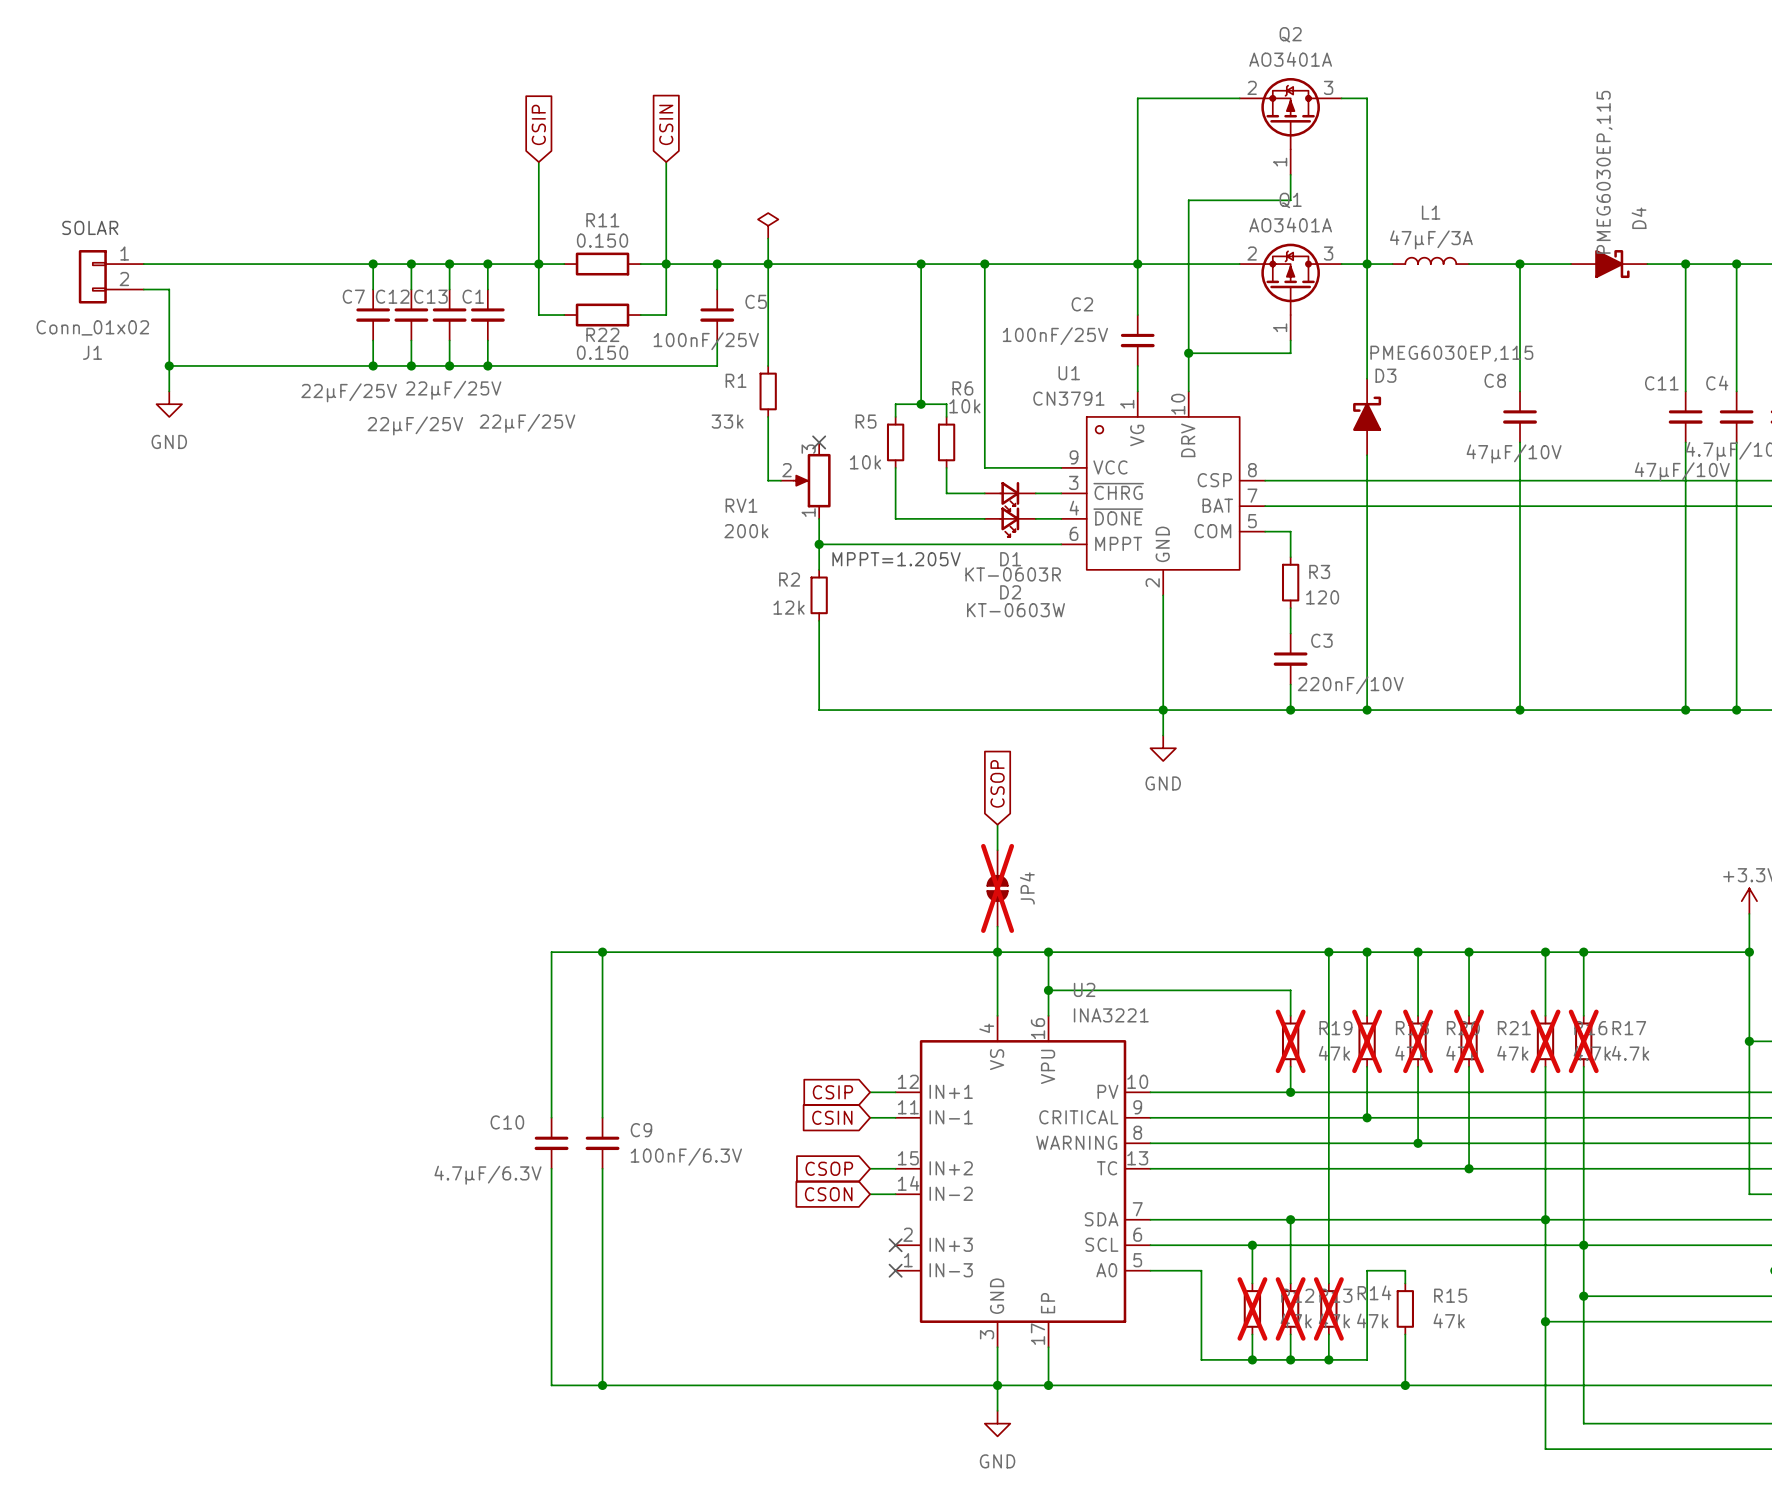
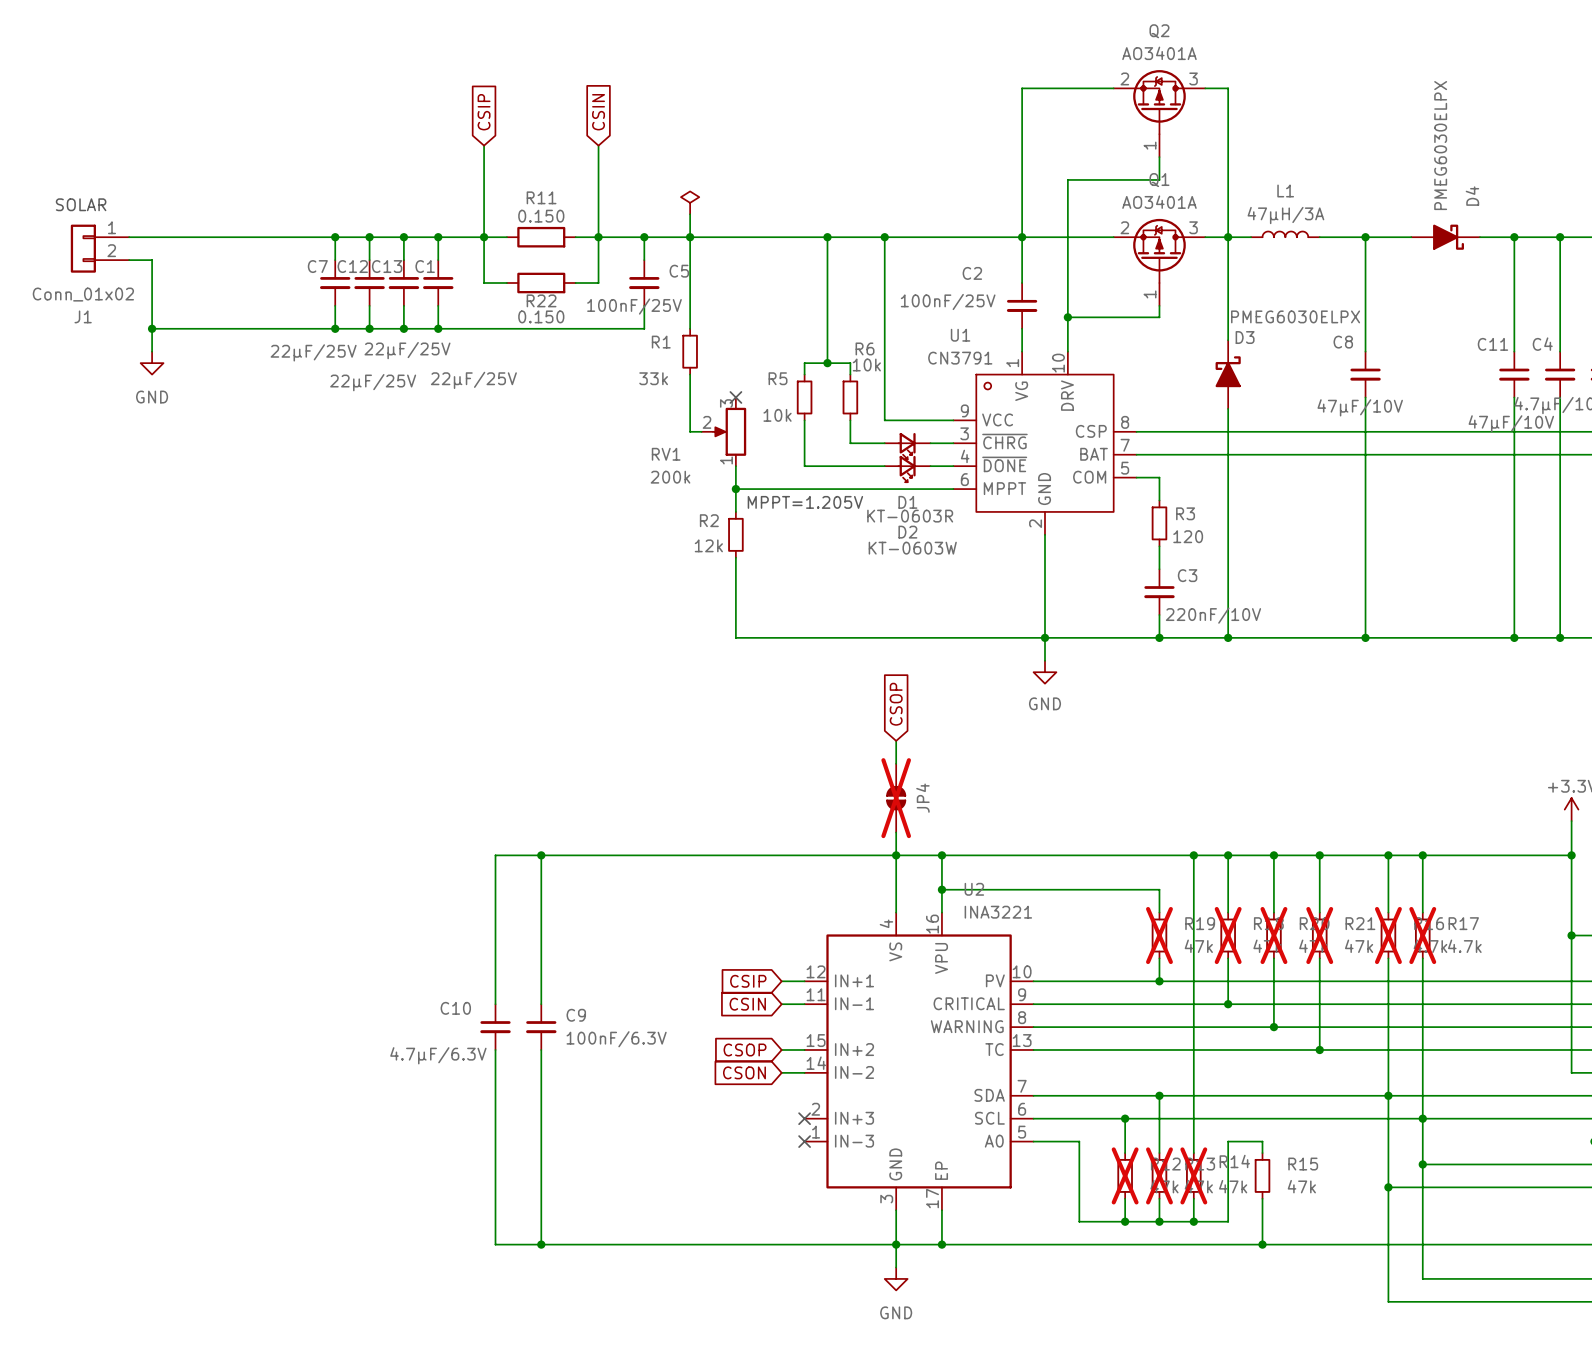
D4 value: PMEG6030EP,115 (1604, 172) -> PMEG6030ELPX (1440, 145)
L1 value: 47µF/3A (1431, 239) -> 47µH/3A (1285, 215)
D3 value: PMEG6030EP,115 (1451, 353) -> PMEG6030ELPX (1295, 316)

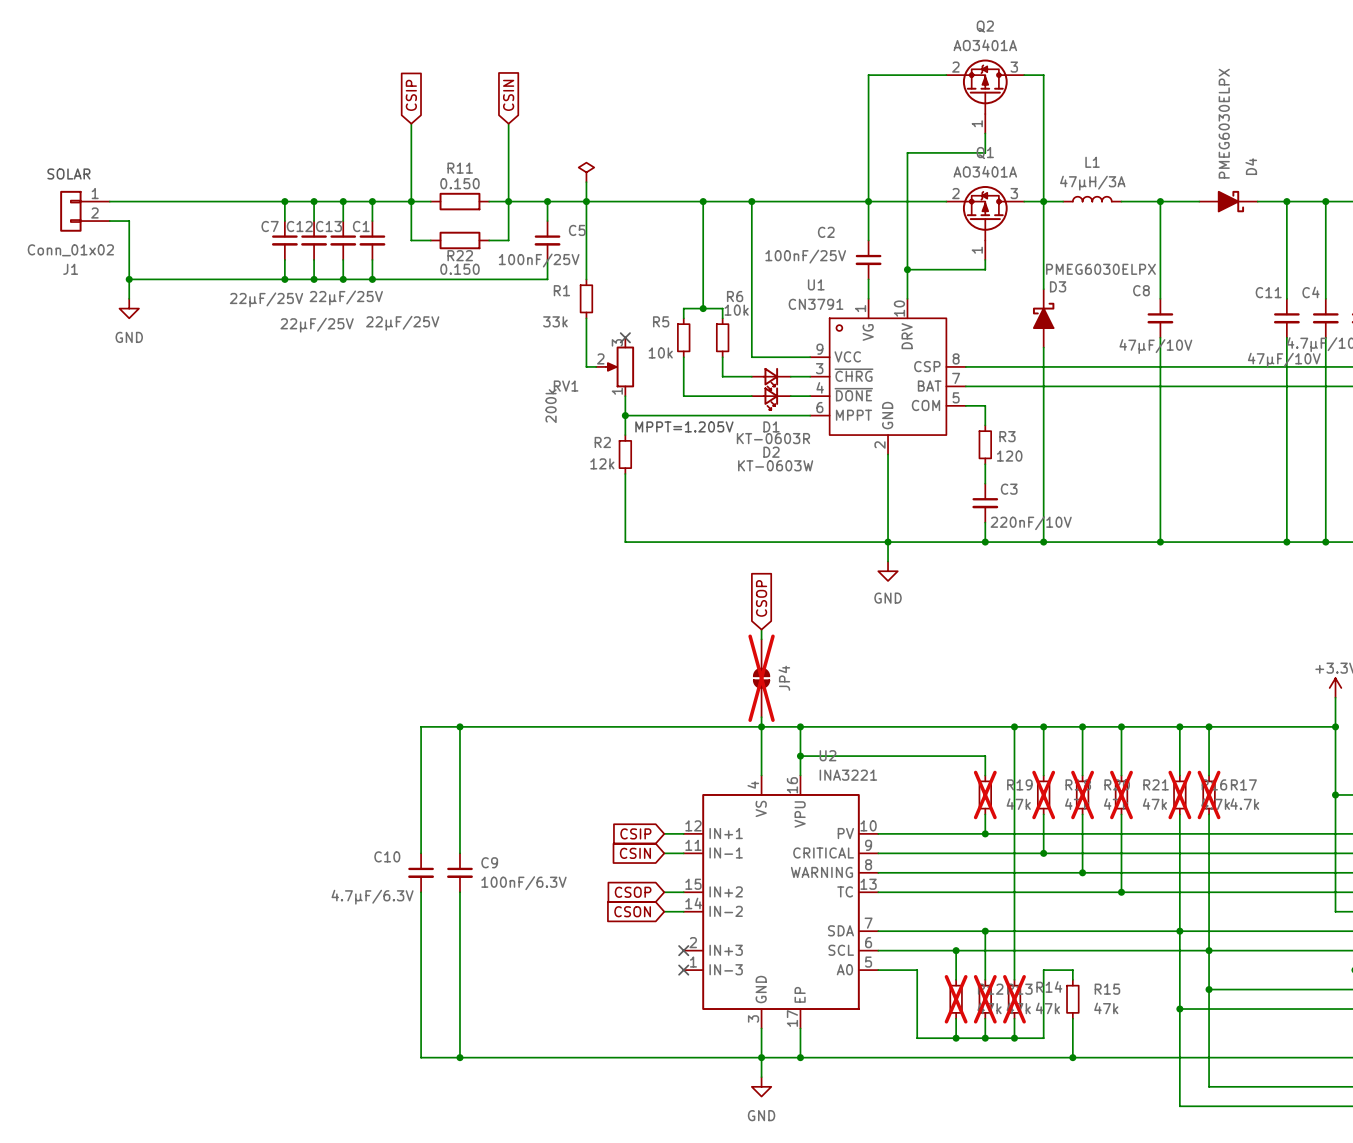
RV1 value rotation: 0° (670, 477) -> 90° counterclockwise (551, 406)
JP4 symbol: [887, 763, 906, 833] -> [753, 639, 770, 718]

